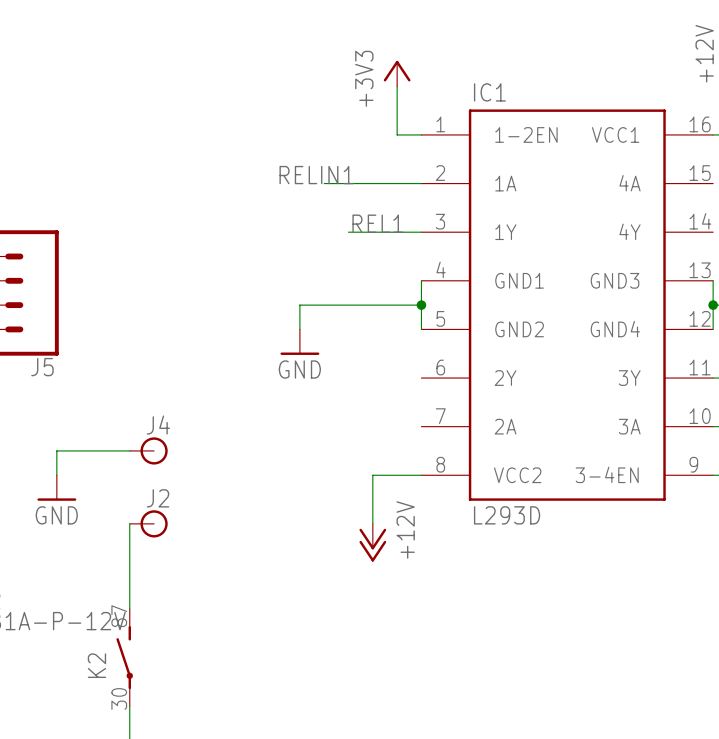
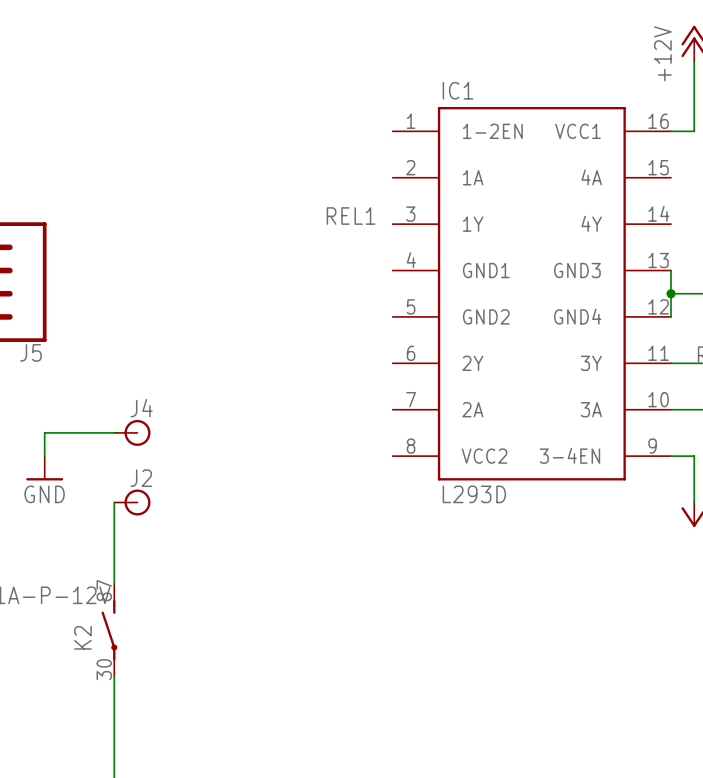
power symbol: +3V3 (397, 73) -> none
wire: (397, 86) (397, 134) (421, 134) -> none
label: RELIN1 (316, 175) -> none
wire: (324, 183) (421, 183) -> none
wire: (348, 232) (421, 232) -> none
wire: (421, 280) (421, 329) -> none
wire: (421, 305) (299, 305) (299, 329) -> none
junction: (421, 305) -> none
power symbol: GND (299, 342) -> none
wire: (421, 475) (372, 475) (372, 523) -> none
power symbol: +12V (372, 542) -> none

